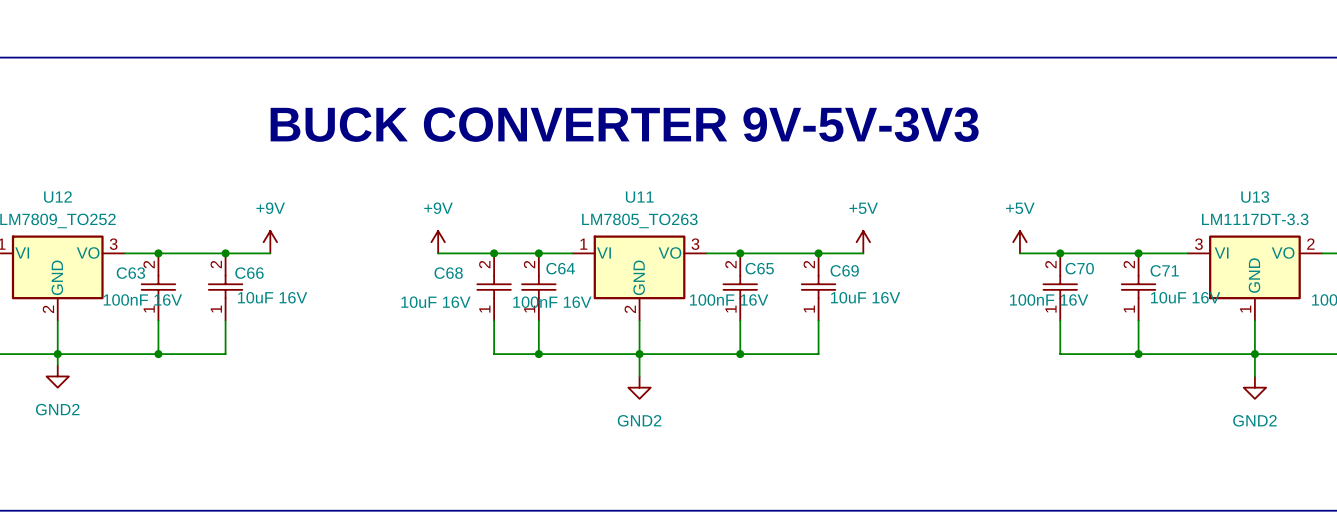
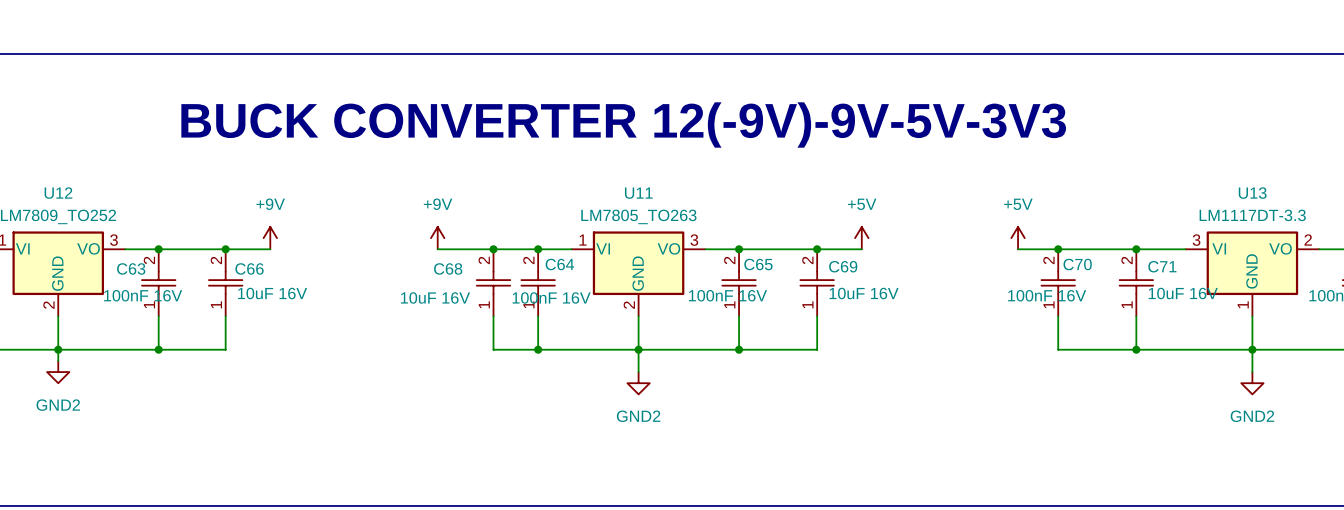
text: BUCK CONVERTER 9V-5V-3V3 (624, 124) -> BUCK CONVERTER 12(-9V)-9V-5V-3V3 (623, 125)

